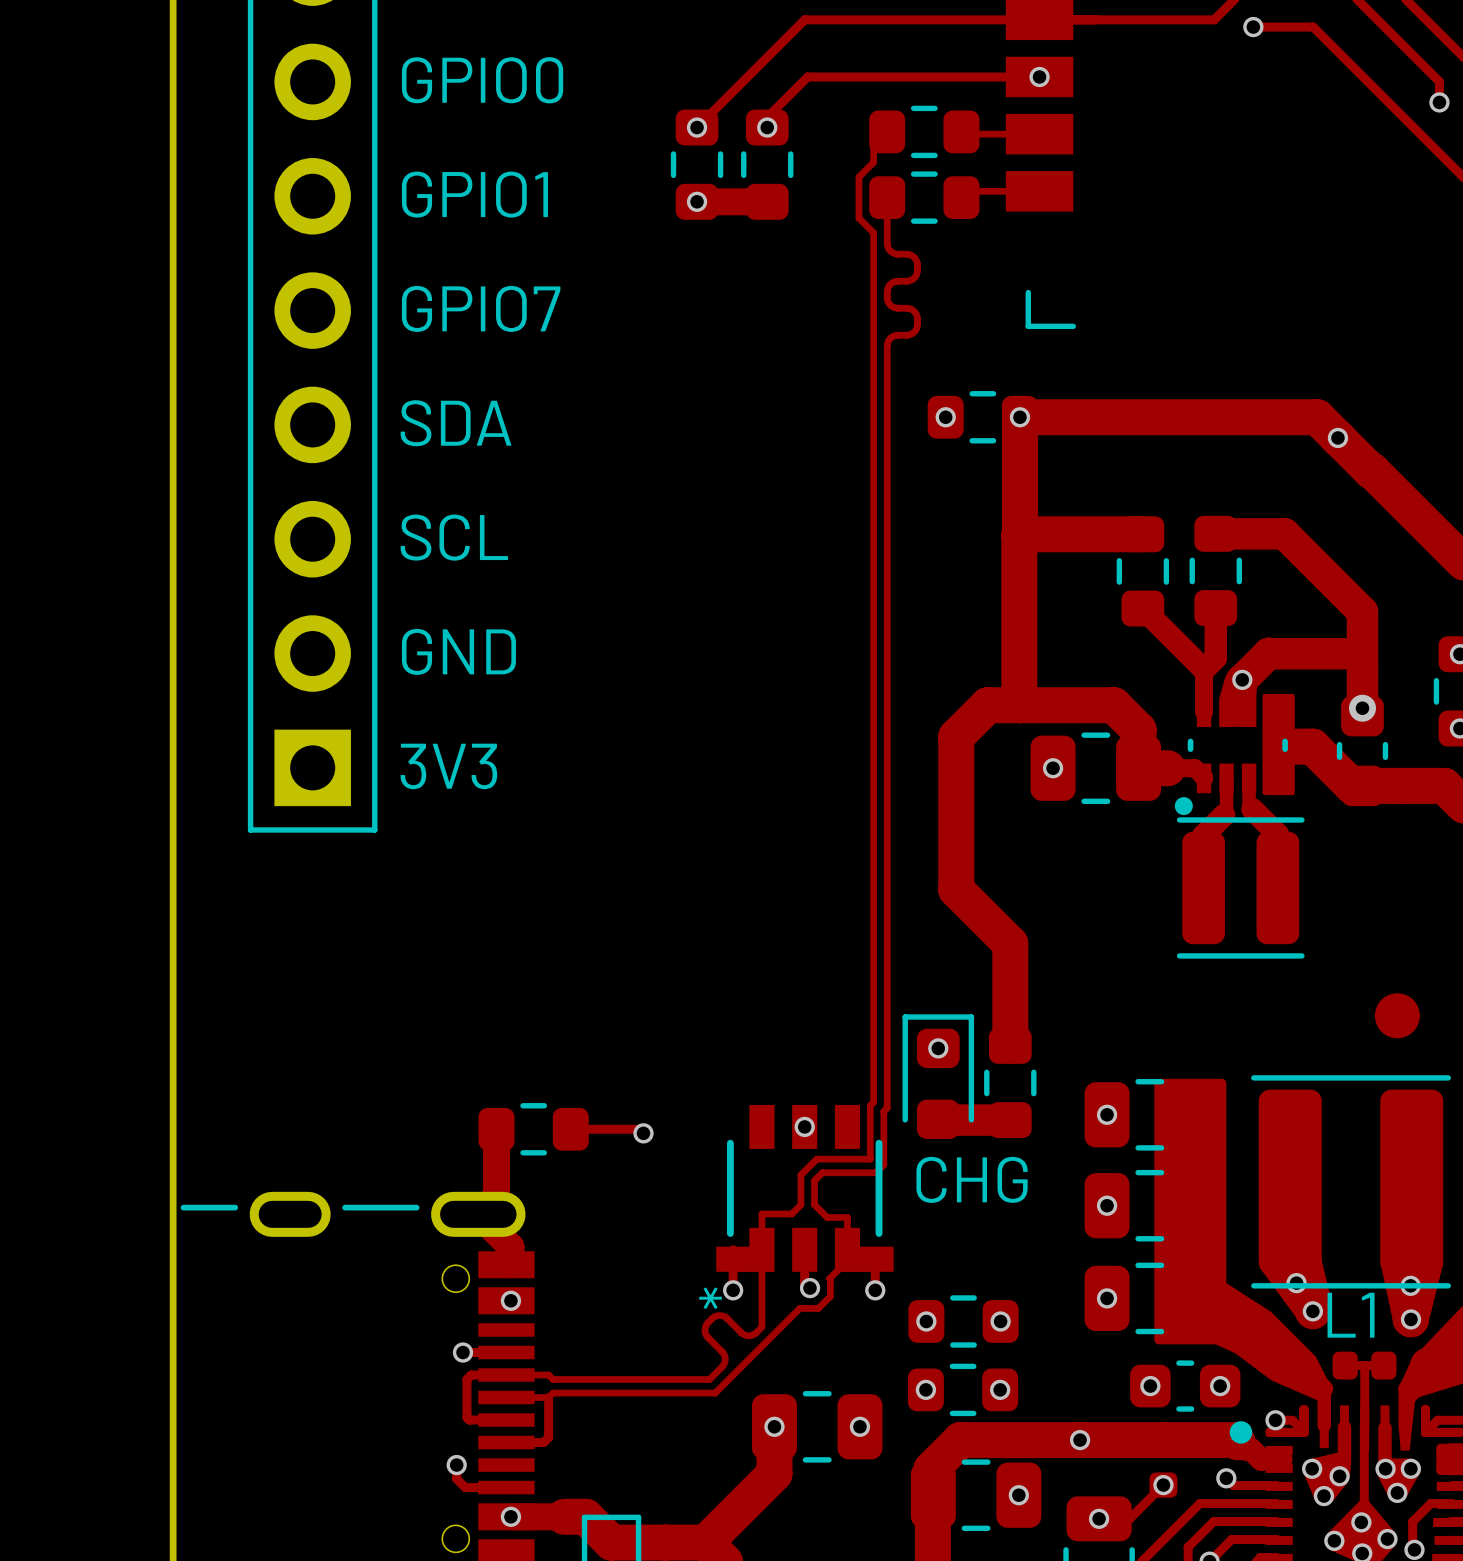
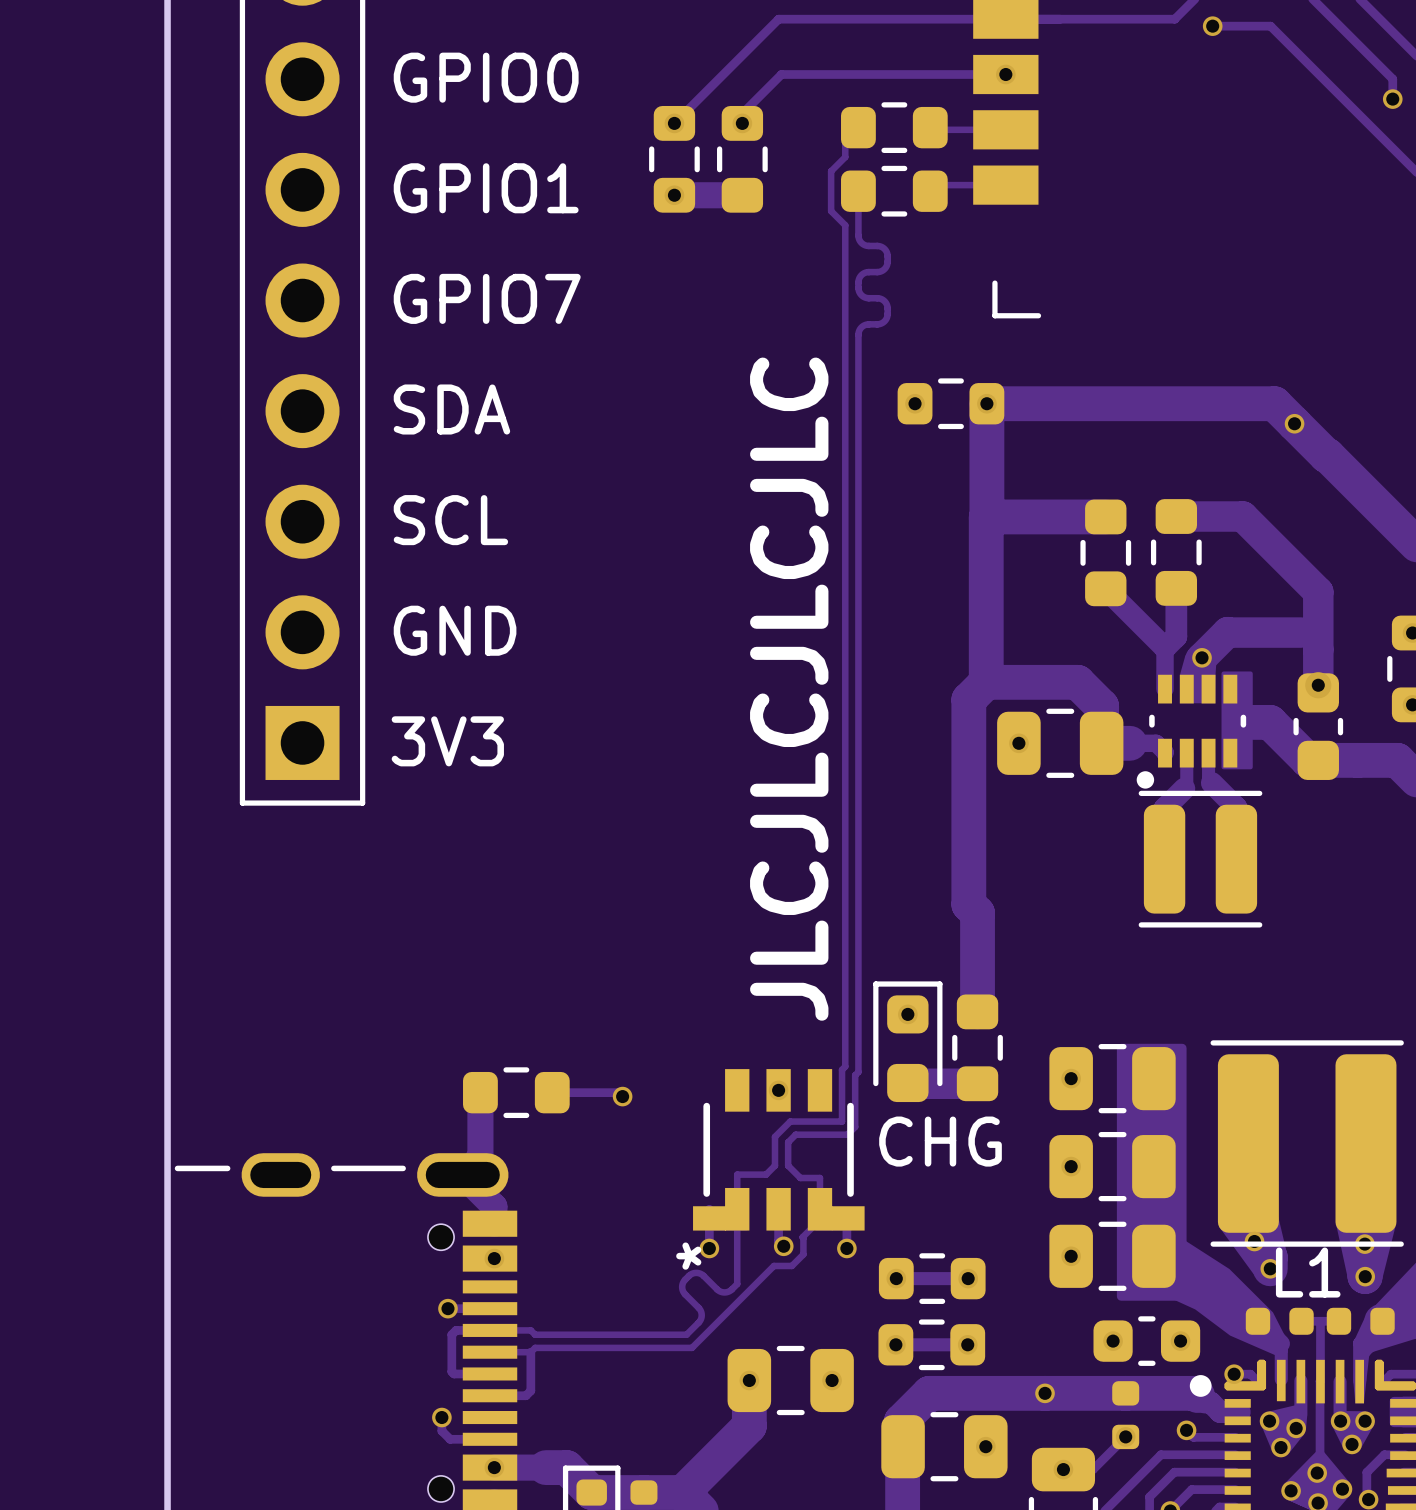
track: (1019, 705) (987, 705) (956, 736) (956, 889) (1001, 934) -> (986, 682) (968, 699) (968, 904)
text: none -> JLCJLCJLCJLC (789, 689)
part: (1397, 1015) -> none
part footprint: [908, 1295, 1019, 1348] -> [878, 1253, 986, 1304]
part footprint: [907, 1363, 1019, 1417] -> [878, 1319, 986, 1371]

